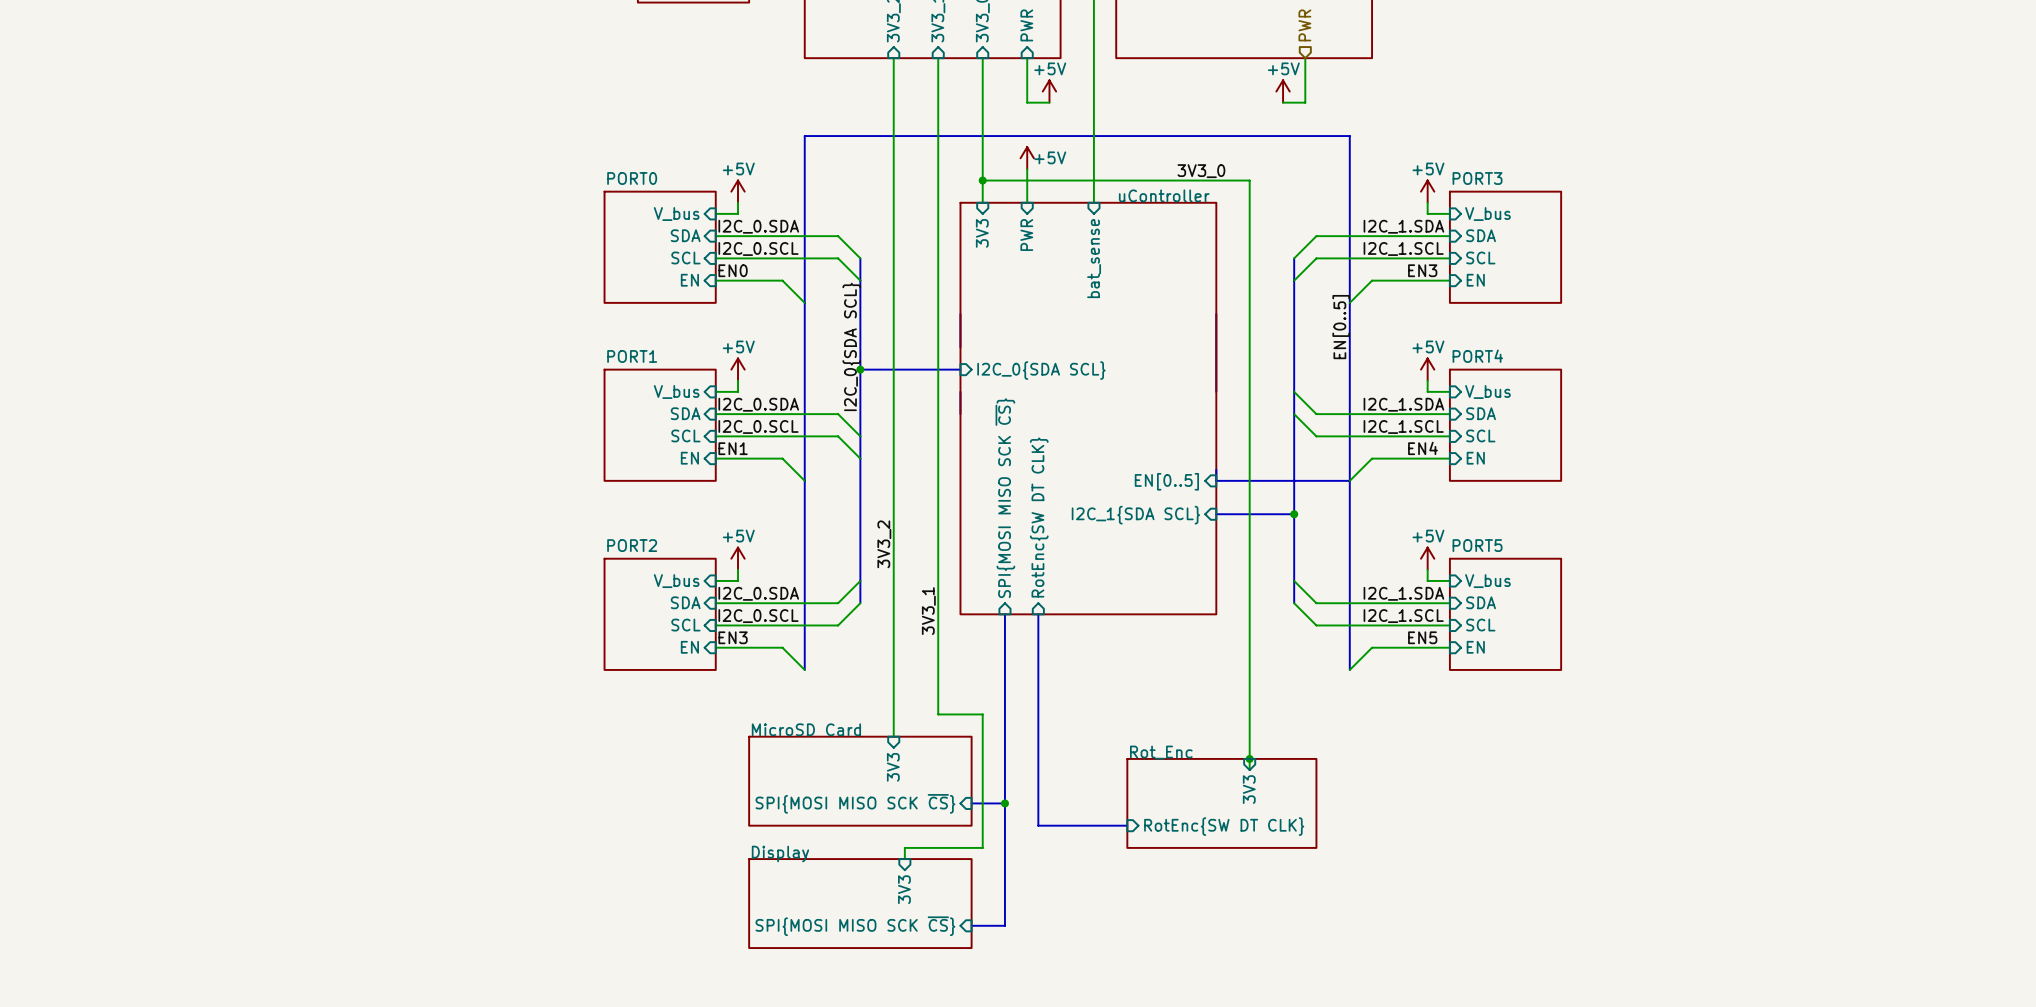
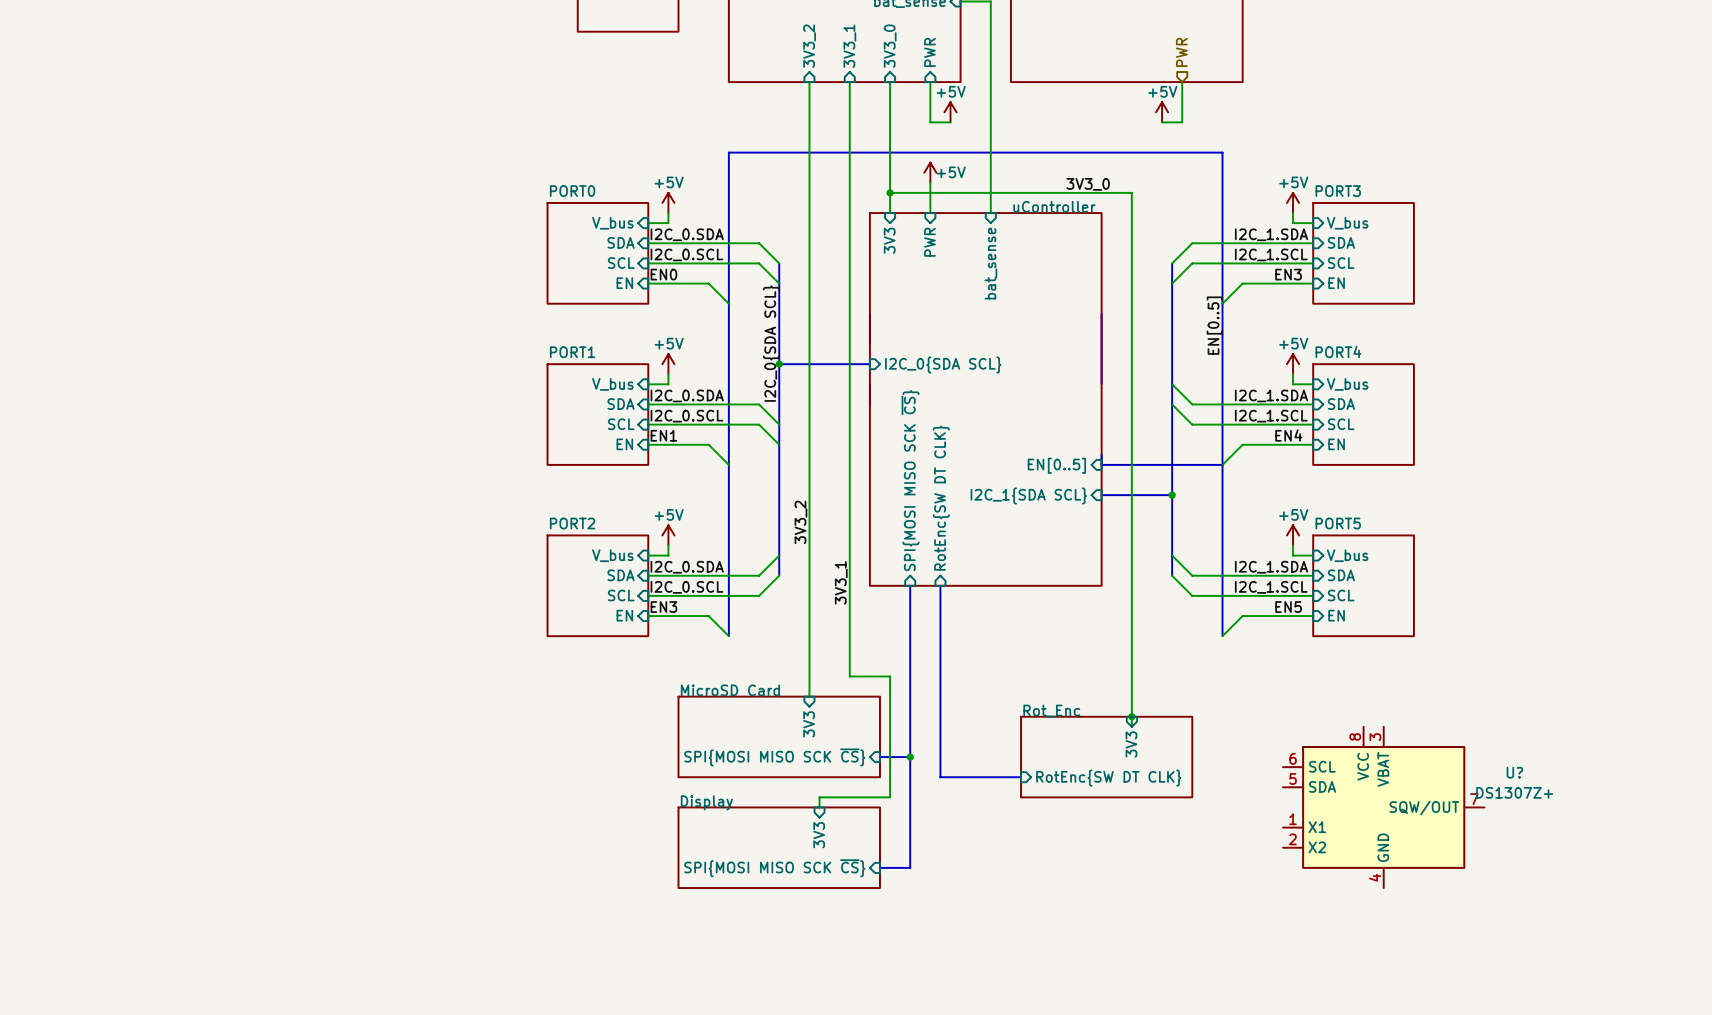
U?: none -> DS1307Z+ (1383, 807)

